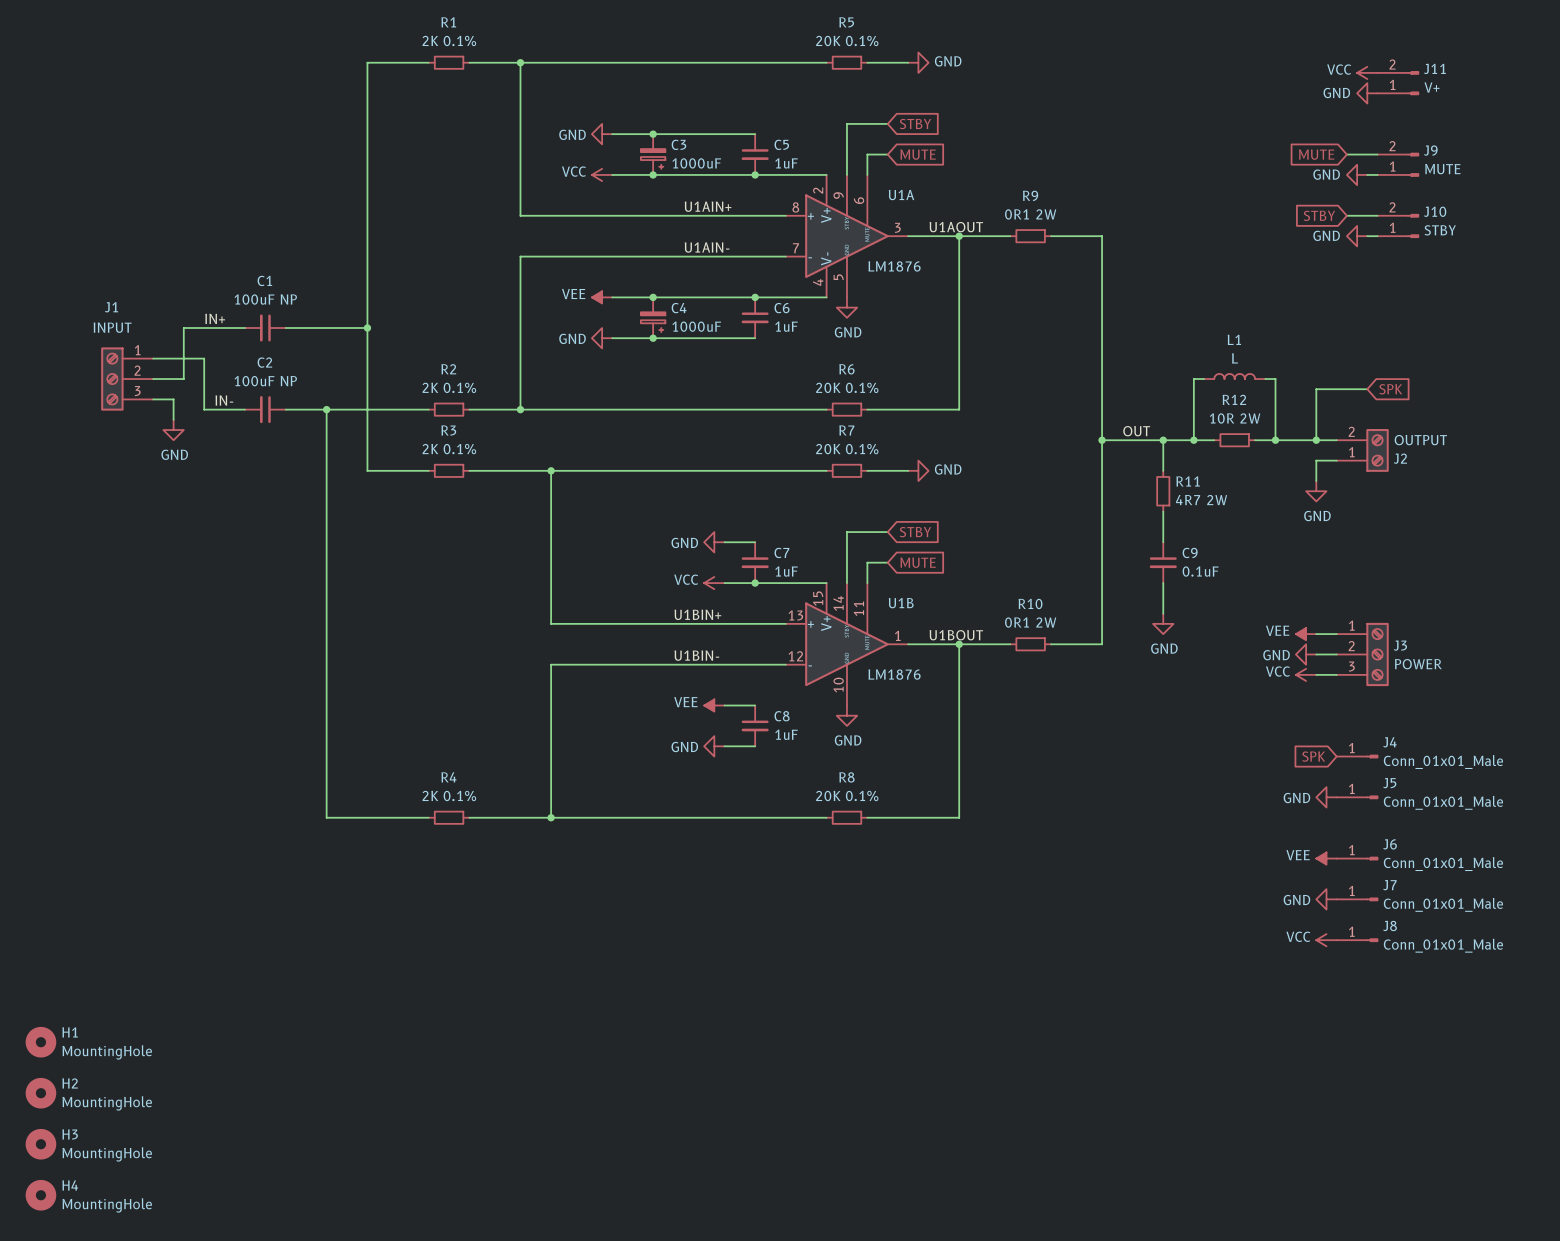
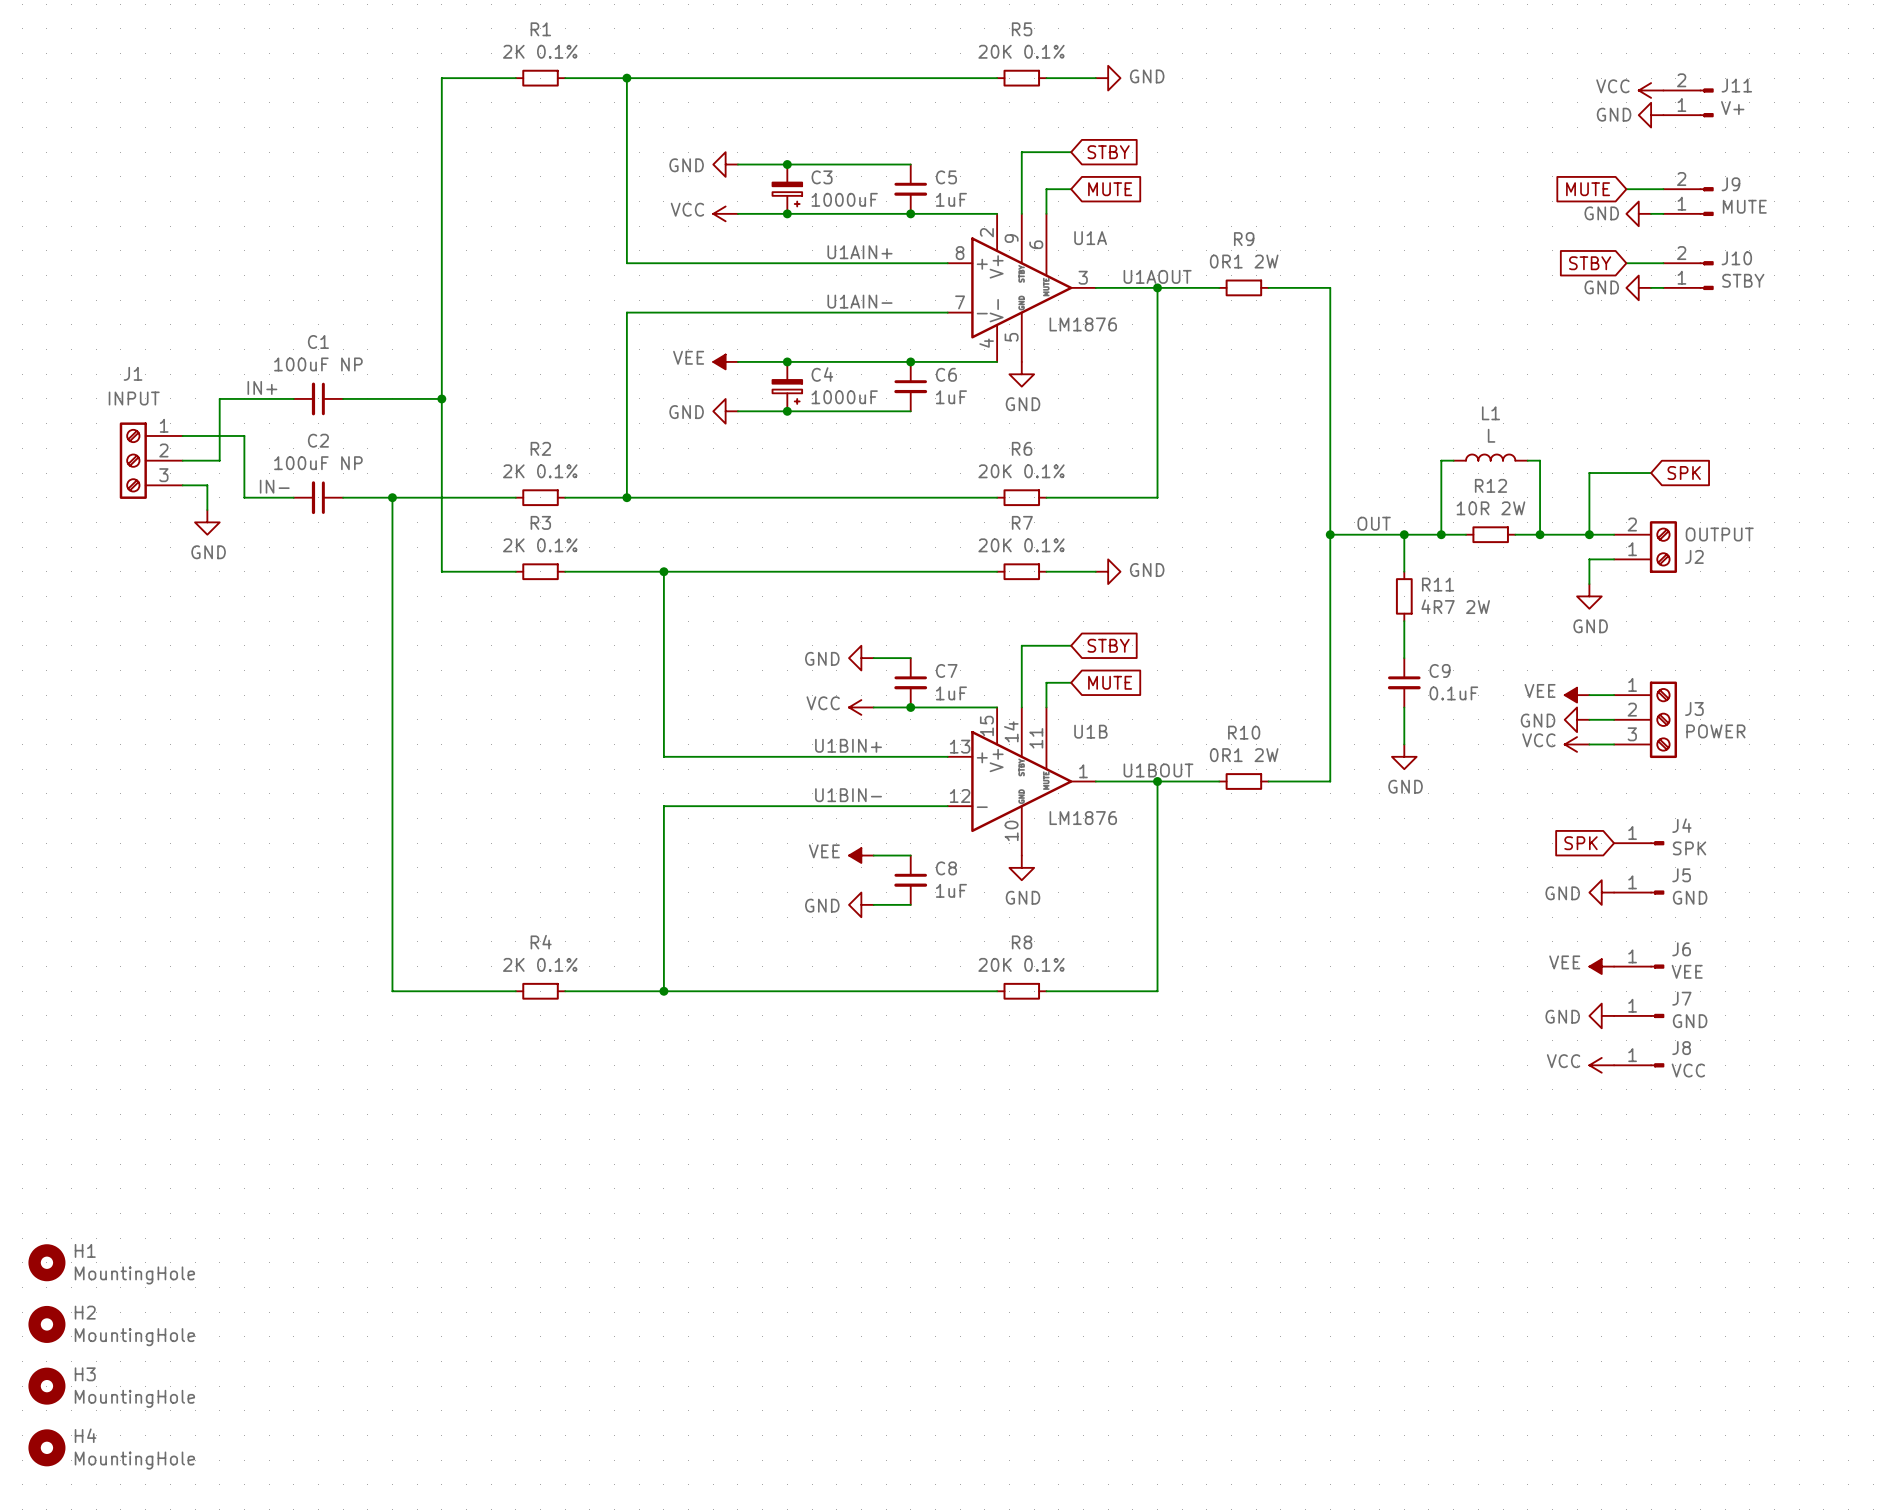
power symbol: none -> GND (1577, 719)
power symbol position: VEE (1306, 634) -> VEE (1577, 695)
wire: (1316, 634) (1336, 634) -> (1589, 695) (1614, 695)
power symbol: GND (1306, 654) -> none
wire: (1316, 654) (1336, 654) -> (1589, 719) (1614, 719)
J3 position: (1362, 654) -> (1645, 719)
power symbol position: VCC (1306, 674) -> VCC (1577, 744)
wire: (1316, 674) (1336, 674) -> (1589, 744) (1614, 744)
power symbol: none -> GND (1601, 892)
J5: none -> GND (1639, 892)
global label position: SPK (1313, 756) -> SPK (1581, 843)
J4 position: (1357, 756) -> (1639, 843)
J4 value: Conn_01x01_Male (1443, 762) -> SPK (1689, 848)
J5 name: J5 (1389, 783) -> J6 (1681, 949)
power symbol: GND (1326, 797) -> VEE (1601, 966)
J5 value: Conn_01x01_Male (1443, 802) -> VEE (1687, 971)
power symbol: VEE (1326, 858) -> none
J6: Conn_01x01_Male (1357, 858) -> none
power symbol position: GND (1326, 899) -> GND (1601, 1015)
J7 position: (1357, 899) -> (1639, 1015)
J7 value: Conn_01x01_Male (1443, 904) -> GND (1690, 1021)
power symbol position: VCC (1326, 940) -> VCC (1601, 1065)
J8 position: (1357, 940) -> (1639, 1065)
J8 value: Conn_01x01_Male (1443, 945) -> VCC (1688, 1070)

